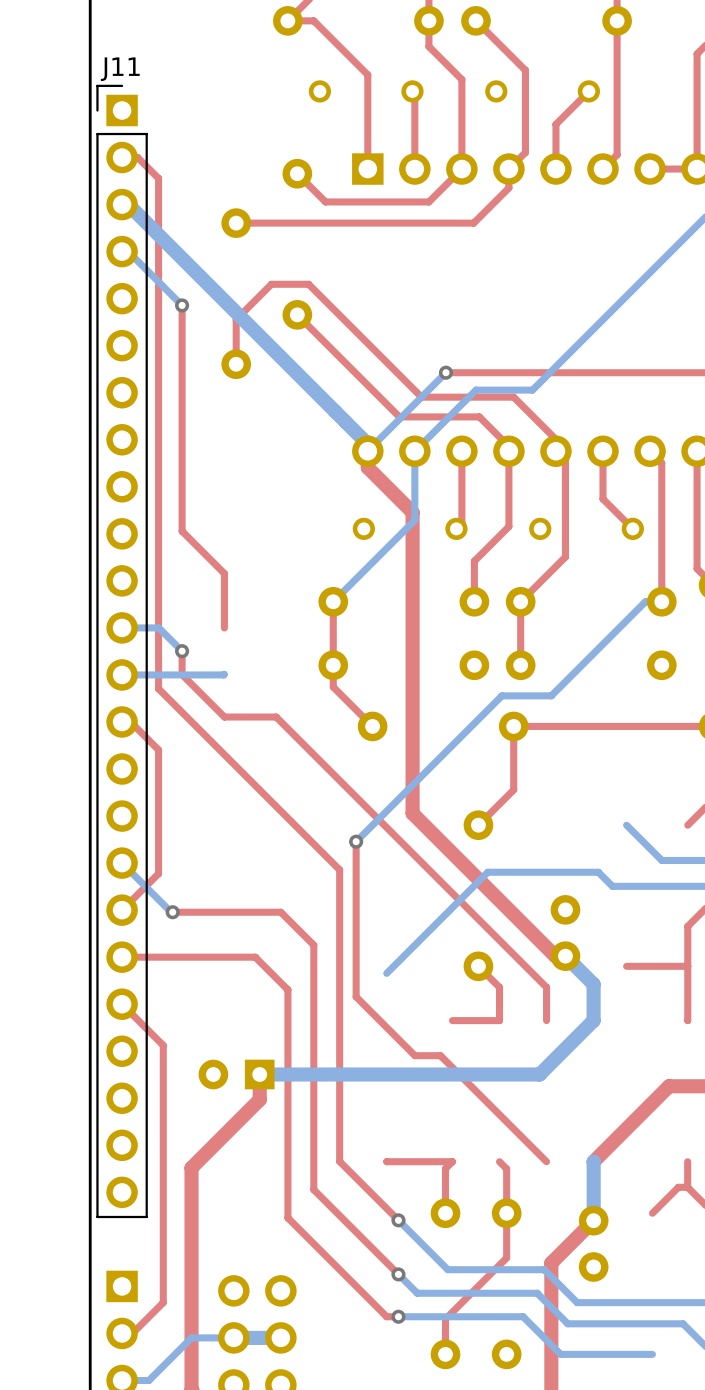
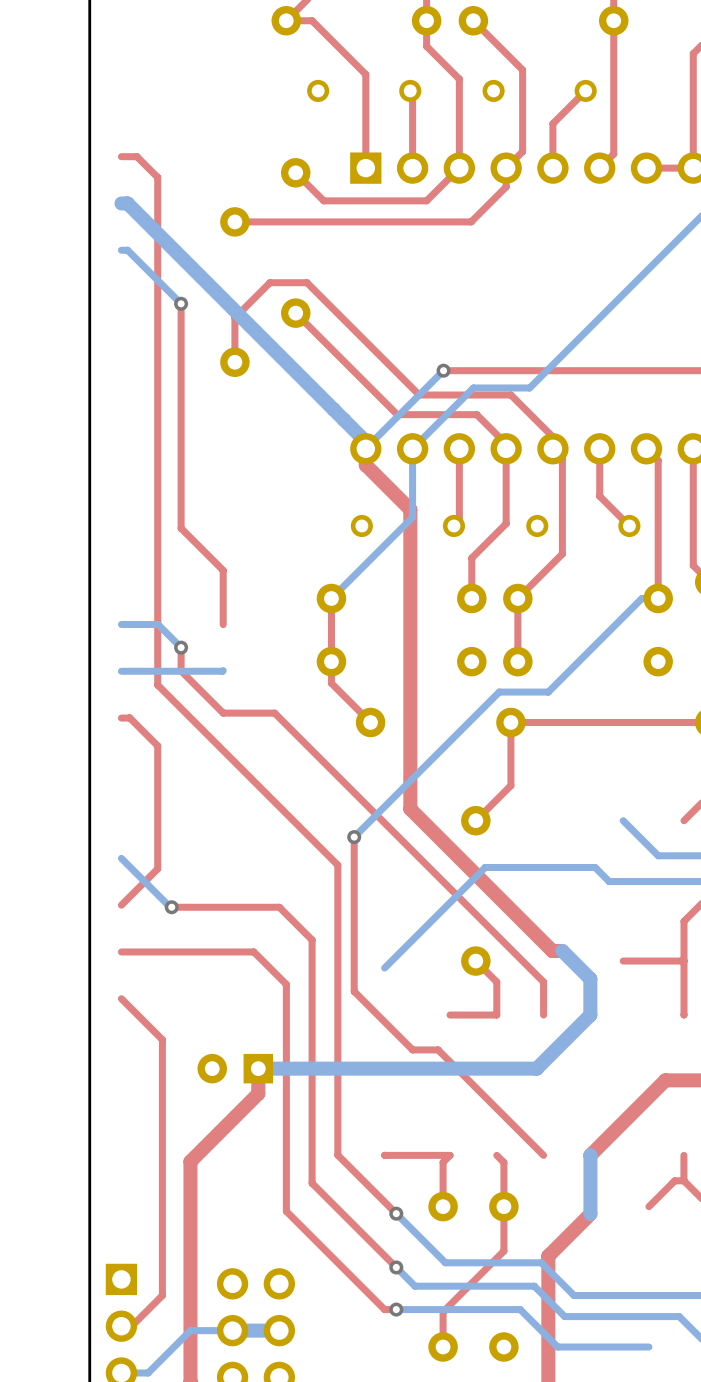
J11: (122, 651) -> none
part: (565, 933) -> none
part: (593, 1243) -> none

